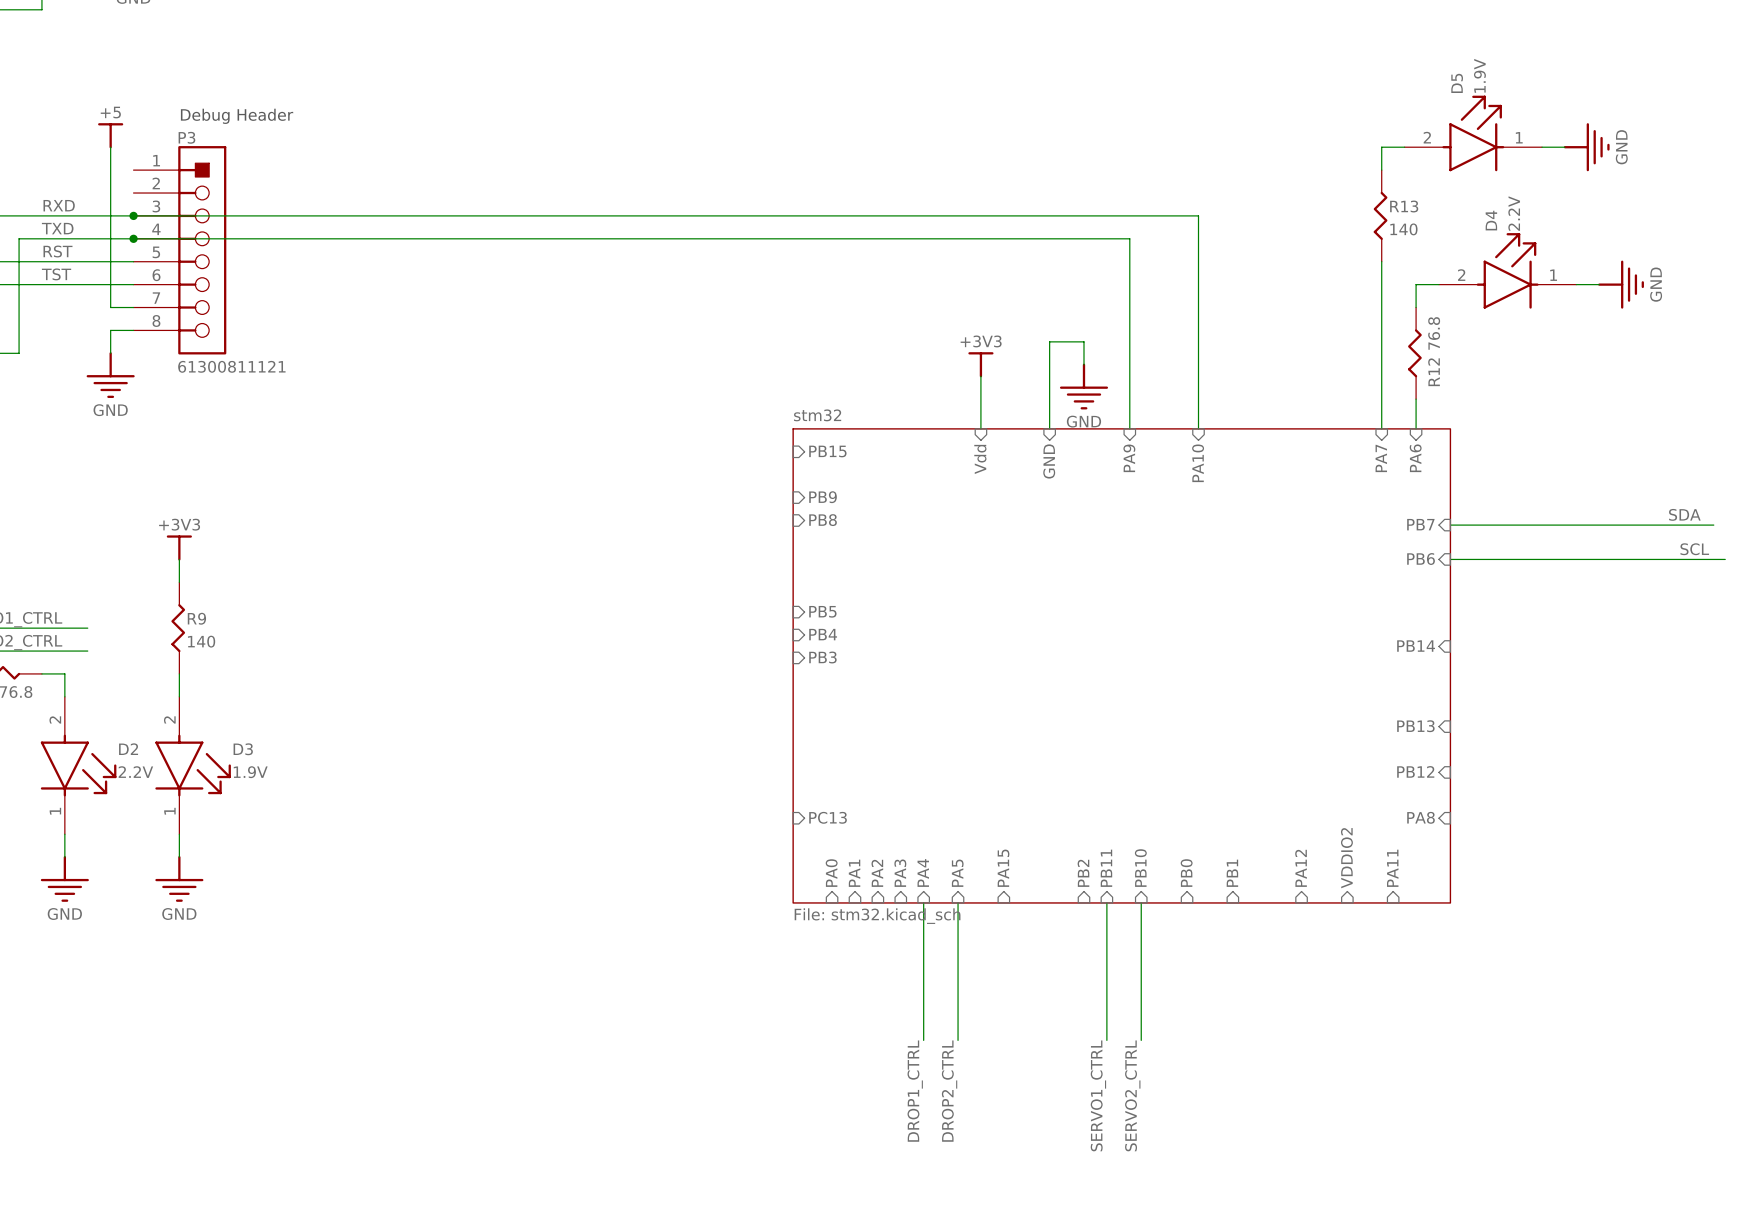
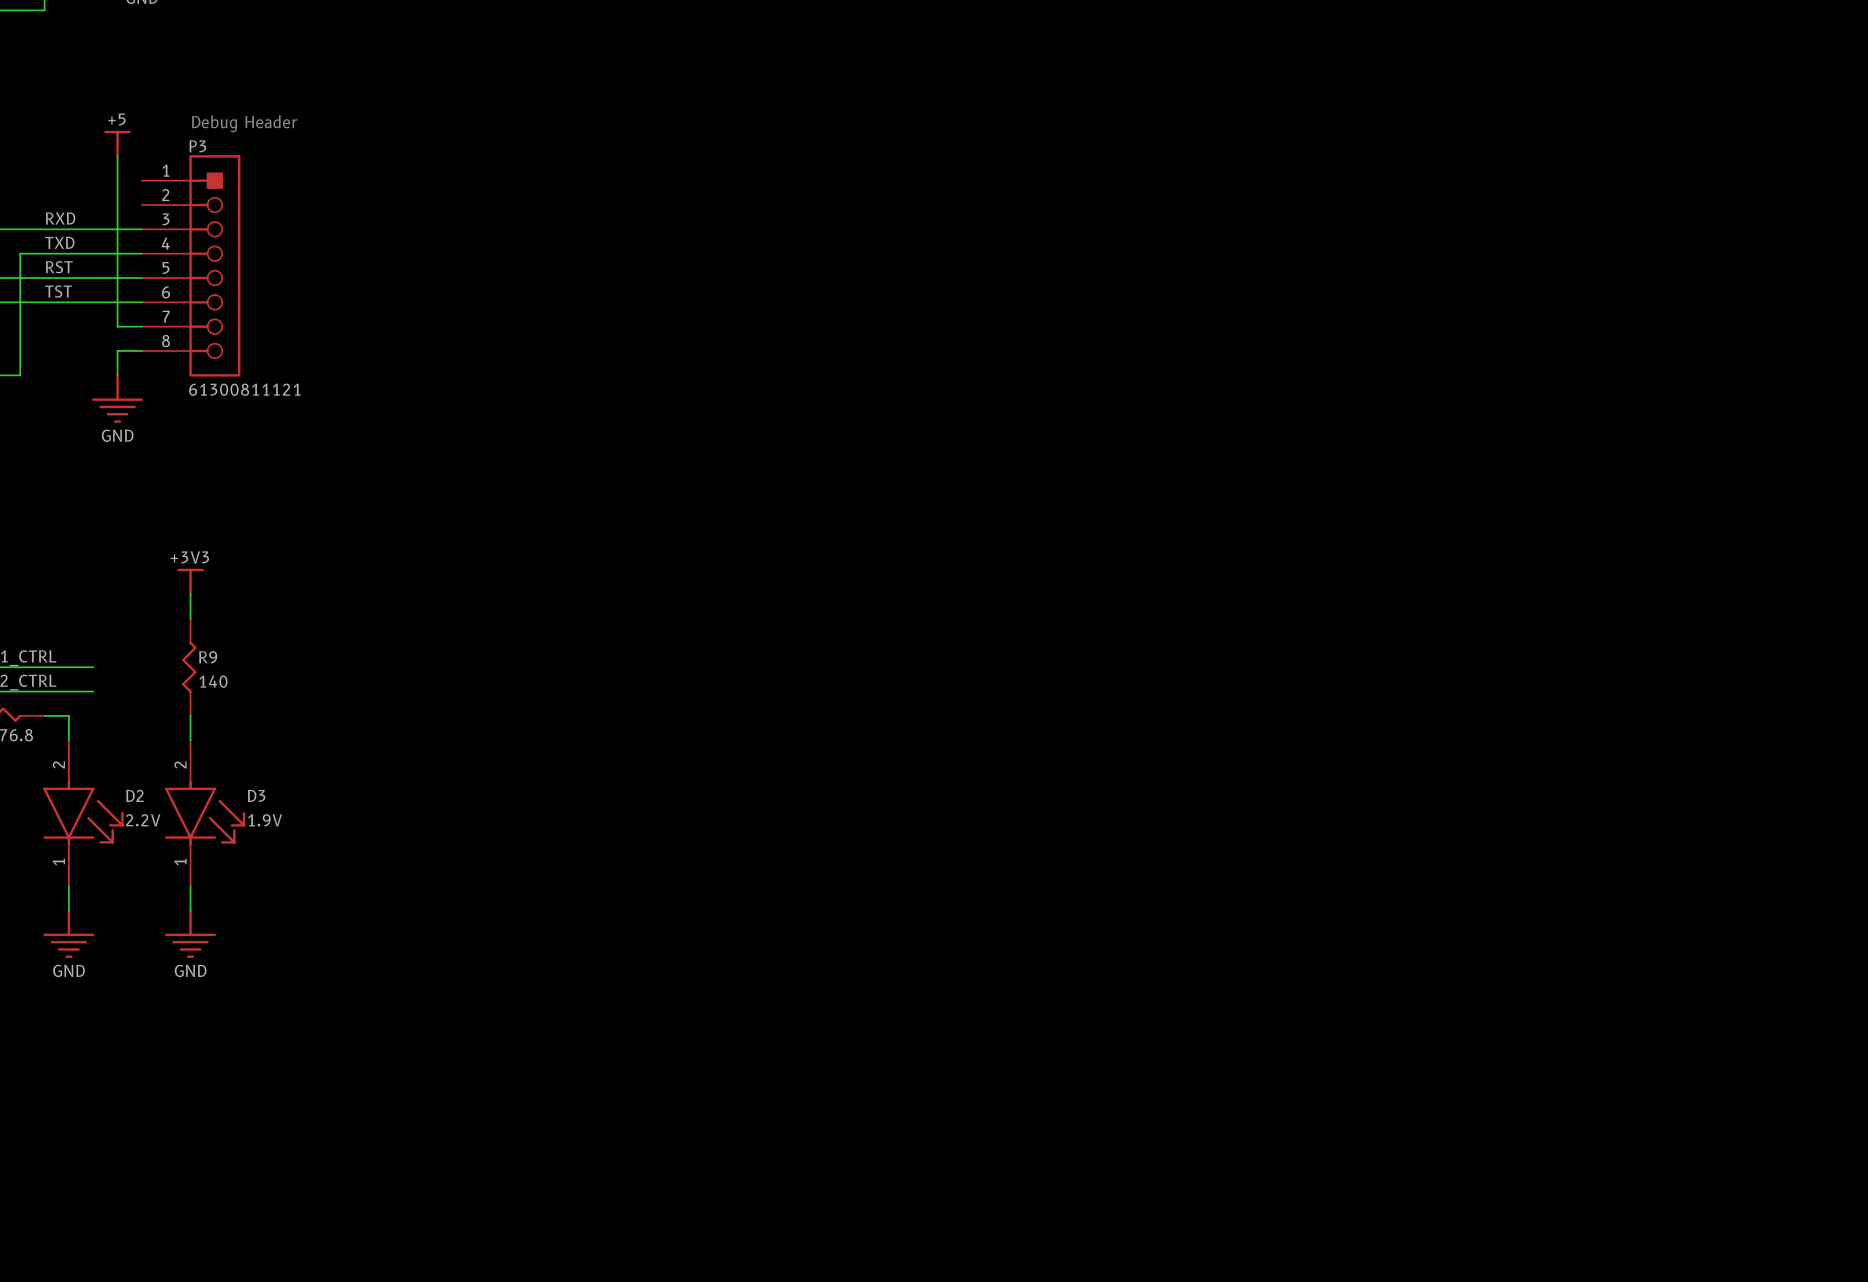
D5: 1.9V (1473, 133) -> none
wire: (1404, 147) (1381, 147) (1381, 170) -> none
wire: (1542, 147) (1564, 147) -> none
power symbol: GND (1586, 147) -> none
wire: (133, 215) (1198, 215) (1198, 428) -> none
junction: (133, 215) -> none
R13: 140 (1380, 215) -> none
wire: (133, 238) (1129, 238) (1129, 428) -> none
junction: (133, 238) -> none
wire: (1381, 261) (1381, 428) -> none
D4: 2.2V (1507, 270) -> none
wire: (1438, 284) (1416, 284) (1416, 307) -> none
wire: (1576, 284) (1599, 284) -> none
power symbol: GND (1621, 284) -> none
R12: 76.8 (1414, 353) -> none
power symbol: +3V3 (980, 364) -> none
wire: (1083, 364) (1083, 341) (1049, 341) (1049, 428) -> none
wire: (980, 376) (980, 428) -> none
power symbol: GND (1083, 386) -> none
wire: (1416, 399) (1416, 428) -> none
sheet pin: PB15 (827, 451) -> none
sheet pin: PA9 (1129, 458) -> none
sheet pin: PA7 (1381, 458) -> none
sheet pin: PA6 (1415, 458) -> none
sheet pin: Vdd (980, 459) -> none
sheet pin: GND (1049, 461) -> none
sheet pin: PA10 (1198, 463) -> none
sheet pin: PB9 (823, 497) -> none
label: SDA (1684, 514) -> none
sheet pin: PB8 (823, 520) -> none
sheet pin: PB7 (1420, 524) -> none
wire: (1450, 525) (1713, 525) -> none
label: SCL (1694, 549) -> none
sheet pin: PB6 (1421, 559) -> none
wire: (1450, 559) (1725, 559) -> none
sheet pin: PB5 (822, 611) -> none
sheet pin: PB4 (823, 634) -> none
sheet pin: PB14 (1416, 646) -> none
sheet pin: PB3 (822, 657) -> none
sheet stm32: File: stm32.kicad_sch (1121, 665) -> none
sheet pin: PB13 (1415, 726) -> none
sheet pin: PB12 (1415, 771) -> none
sheet pin: PC13 (828, 817) -> none
sheet pin: PA8 (1421, 817) -> none
sheet pin: VDDIO2 (1346, 858) -> none
sheet pin: PA15 (1003, 868) -> none
sheet pin: PB11 (1106, 868) -> none
sheet pin: PB10 (1140, 868) -> none
sheet pin: PA12 (1301, 868) -> none
sheet pin: PA11 (1392, 868) -> none
sheet pin: PA4 (923, 872) -> none
sheet pin: PA0 (831, 873) -> none
sheet pin: PA1 (854, 873) -> none
sheet pin: PA2 (877, 873) -> none
sheet pin: PA3 (900, 873) -> none
sheet pin: PA5 (957, 873) -> none
sheet pin: PB2 (1083, 873) -> none
sheet pin: PB0 (1186, 873) -> none
sheet pin: PB1 (1232, 873) -> none
wire: (923, 902) (923, 1040) -> none
wire: (958, 902) (958, 1040) -> none
wire: (1106, 902) (1106, 1040) -> none
wire: (1141, 902) (1141, 1040) -> none
label: DROP1_CTRL (915, 1091) -> none
label: DROP2_CTRL (949, 1091) -> none
label: SERVO1_CTRL (1098, 1095) -> none
label: SERVO2_CTRL (1132, 1095) -> none

